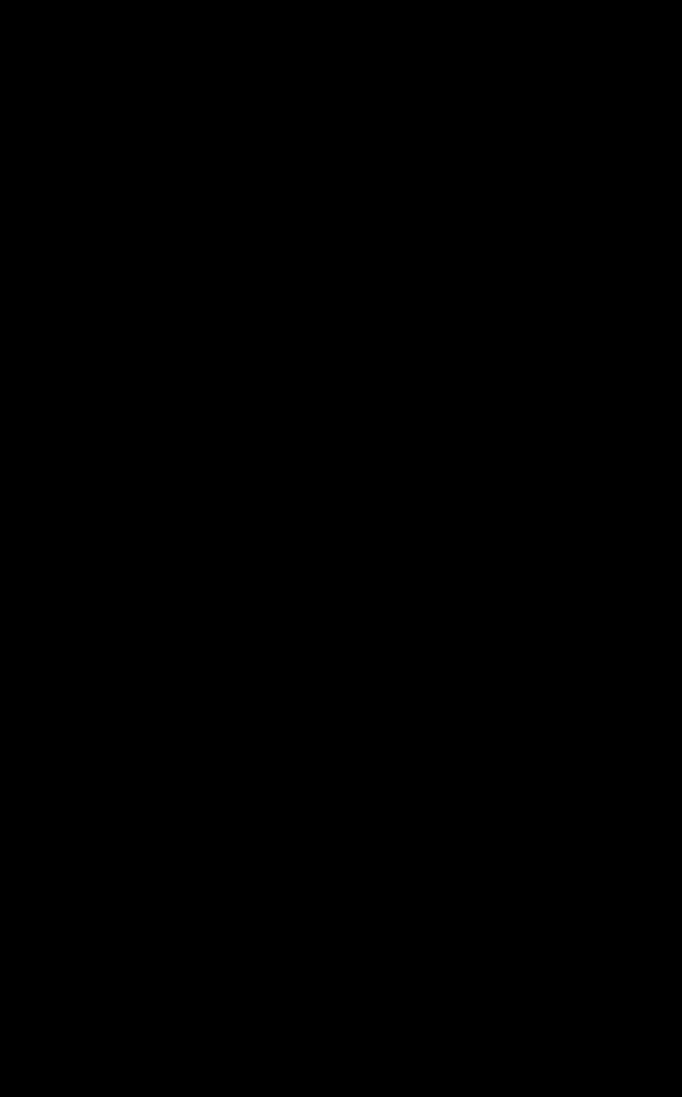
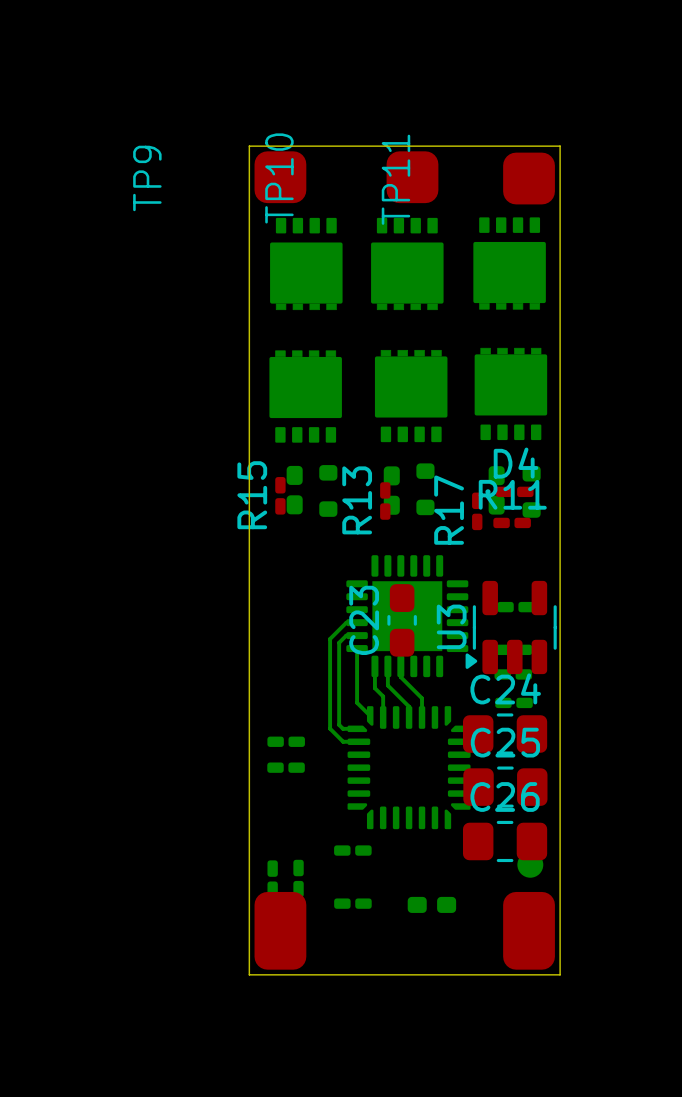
board edge: none -> (249, 146) (560, 146) (560, 974) (249, 974) (249, 146)
TP9: none -> (280, 177)
TP10: none -> (412, 177)
TP11: none -> (529, 178)
part: none -> (306, 263)
part: none -> (407, 263)
part: none -> (509, 263)
part: none -> (510, 393)
part: none -> (305, 396)
part: none -> (411, 396)
part: none -> (425, 489)
part: none -> (294, 490)
part: none -> (328, 490)
part: none -> (391, 490)
part: none -> (496, 490)
D4: none -> (509, 491)
part: none -> (531, 491)
R15: none -> (280, 495)
R13: none -> (385, 500)
R17: none -> (477, 511)
R11: none -> (512, 522)
part: none -> (516, 607)
part: none -> (407, 616)
C23: none -> (402, 620)
bottom track: none -> (357, 622) (346, 622) (330, 639) (330, 728) (343, 741) (358, 741)
U3: none -> (511, 627)
bottom track: none -> (357, 635) (346, 635) (339, 642) (339, 724) (343, 728) (357, 728)
bottom track: none -> (357, 648) (357, 702) (370, 715)
part: none -> (513, 649)
bottom track: none -> (374, 666) (374, 688) (383, 696) (383, 717)
bottom track: none -> (387, 666) (387, 685) (409, 706) (409, 717)
bottom track: none -> (400, 666) (400, 677) (422, 698) (422, 717)
part: none -> (513, 674)
part: none -> (514, 702)
C24: none -> (505, 734)
part: none -> (286, 741)
part: none -> (286, 767)
part: none -> (409, 767)
C25: none -> (505, 787)
C26: none -> (505, 841)
part: none -> (352, 850)
part: none -> (530, 864)
part: none -> (298, 878)
part: none -> (272, 879)
part: none -> (352, 903)
part: none -> (431, 904)
part: none -> (280, 930)
part: none -> (529, 930)

